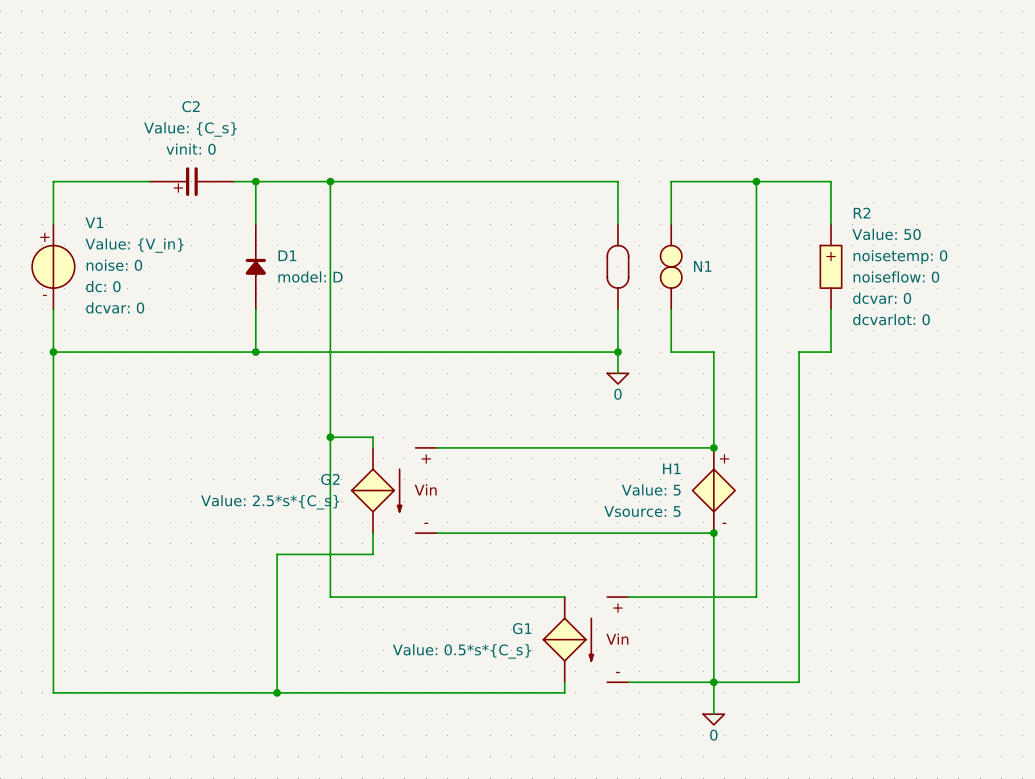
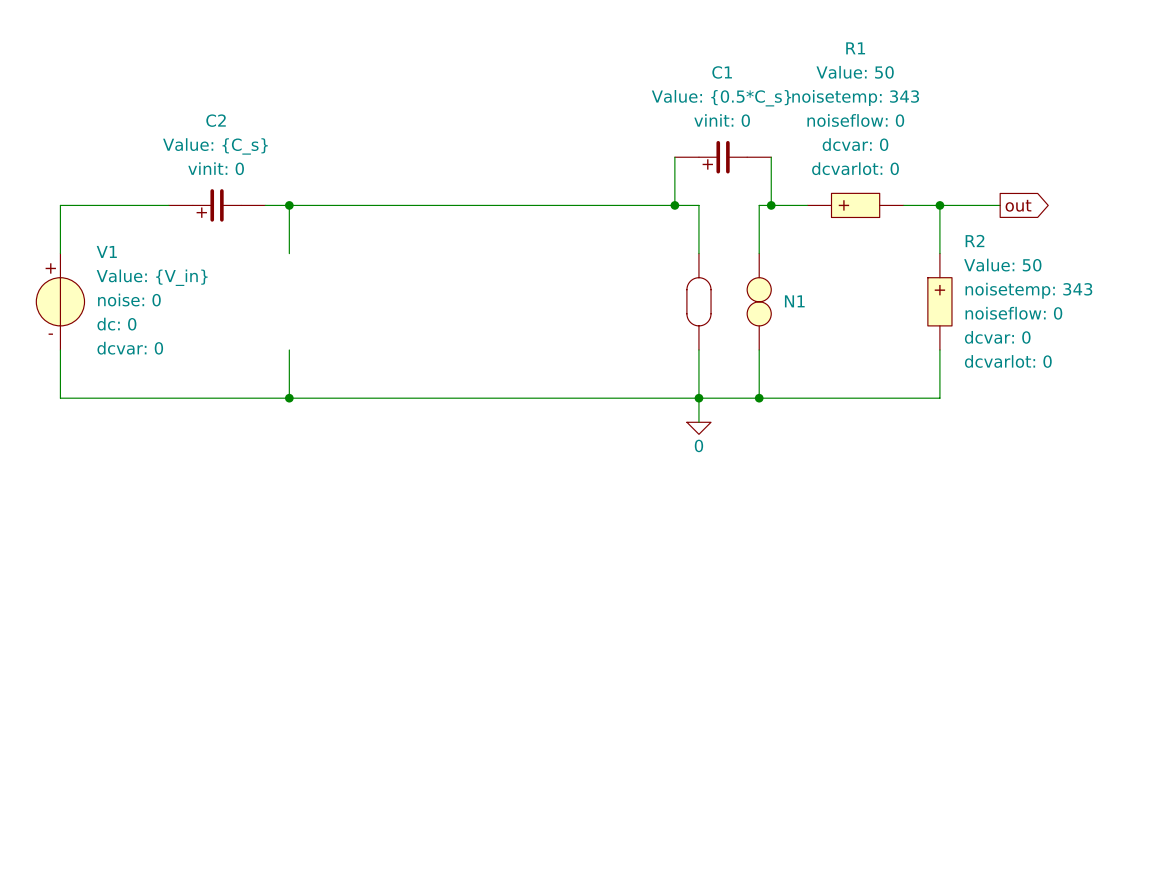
wire: none -> (674, 157) (674, 205)
C1: none -> Value: {0.5*C_s} (723, 157)
wire: none -> (771, 157) (771, 205)
wire: (330, 181) (330, 597) (564, 597) -> none
junction: (330, 181) -> none
junction: none -> (674, 205)
junction: none -> (771, 205)
wire: (756, 181) (756, 597) (628, 597) -> none
junction: (756, 181) -> none
R1: none -> Value: 50 (855, 205)
wire: none -> (939, 205) (1000, 205)
junction: none -> (939, 205)
global label: none -> out (1018, 205)
R2 text: noisetemp: 0 (900, 257) -> noisetemp: 343 (1028, 290)
D1: (255, 266) -> none
wire: (53, 352) (53, 692) (564, 692) (564, 682) -> none
junction: (53, 352) -> none
wire: none -> (698, 398) (759, 398)
junction: none -> (759, 398)
wire: (713, 352) (713, 447) (436, 447) -> none
wire: (799, 352) (799, 682) (628, 682) -> (903, 398) (807, 398)
wire: (330, 437) (372, 437) (372, 447) -> none
junction: (330, 437) -> none
junction: (713, 447) -> none
G2: Value: 2.5*s*{C_s} (394, 490) -> none
H1: Value: 5 (713, 490) -> none
wire: (372, 533) (372, 554) (277, 554) (277, 692) -> none
wire: (436, 533) (713, 533) (713, 714) -> none
junction: (713, 533) -> none
G1: Value: 0.5*s*{C_s} (586, 639) -> none
junction: (713, 682) -> none
junction: (277, 692) -> none
power symbol: 0 (713, 719) -> none

